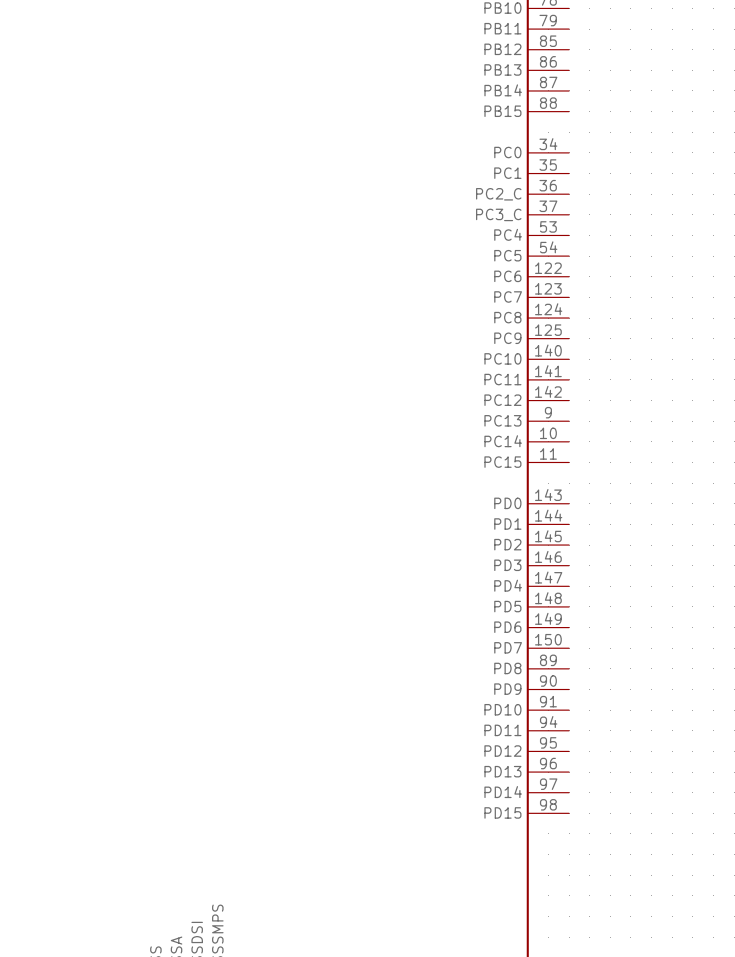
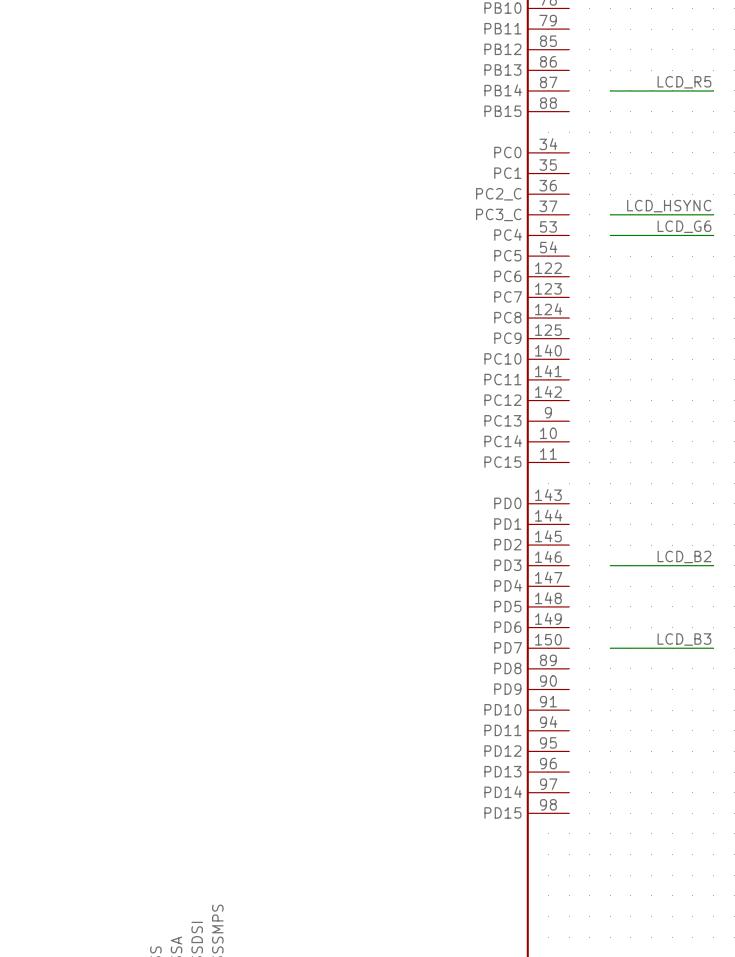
label: none -> LCD_R5 (684, 82)
wire: none -> (610, 90) (713, 90)
label: none -> LCD_HSYNC (669, 206)
wire: none -> (610, 214) (713, 214)
label: none -> LCD_G6 (684, 226)
wire: none -> (610, 235) (713, 235)
label: none -> LCD_B2 (684, 556)
wire: none -> (610, 565) (713, 565)
label: none -> LCD_B3 (684, 639)
wire: none -> (610, 648) (713, 648)

